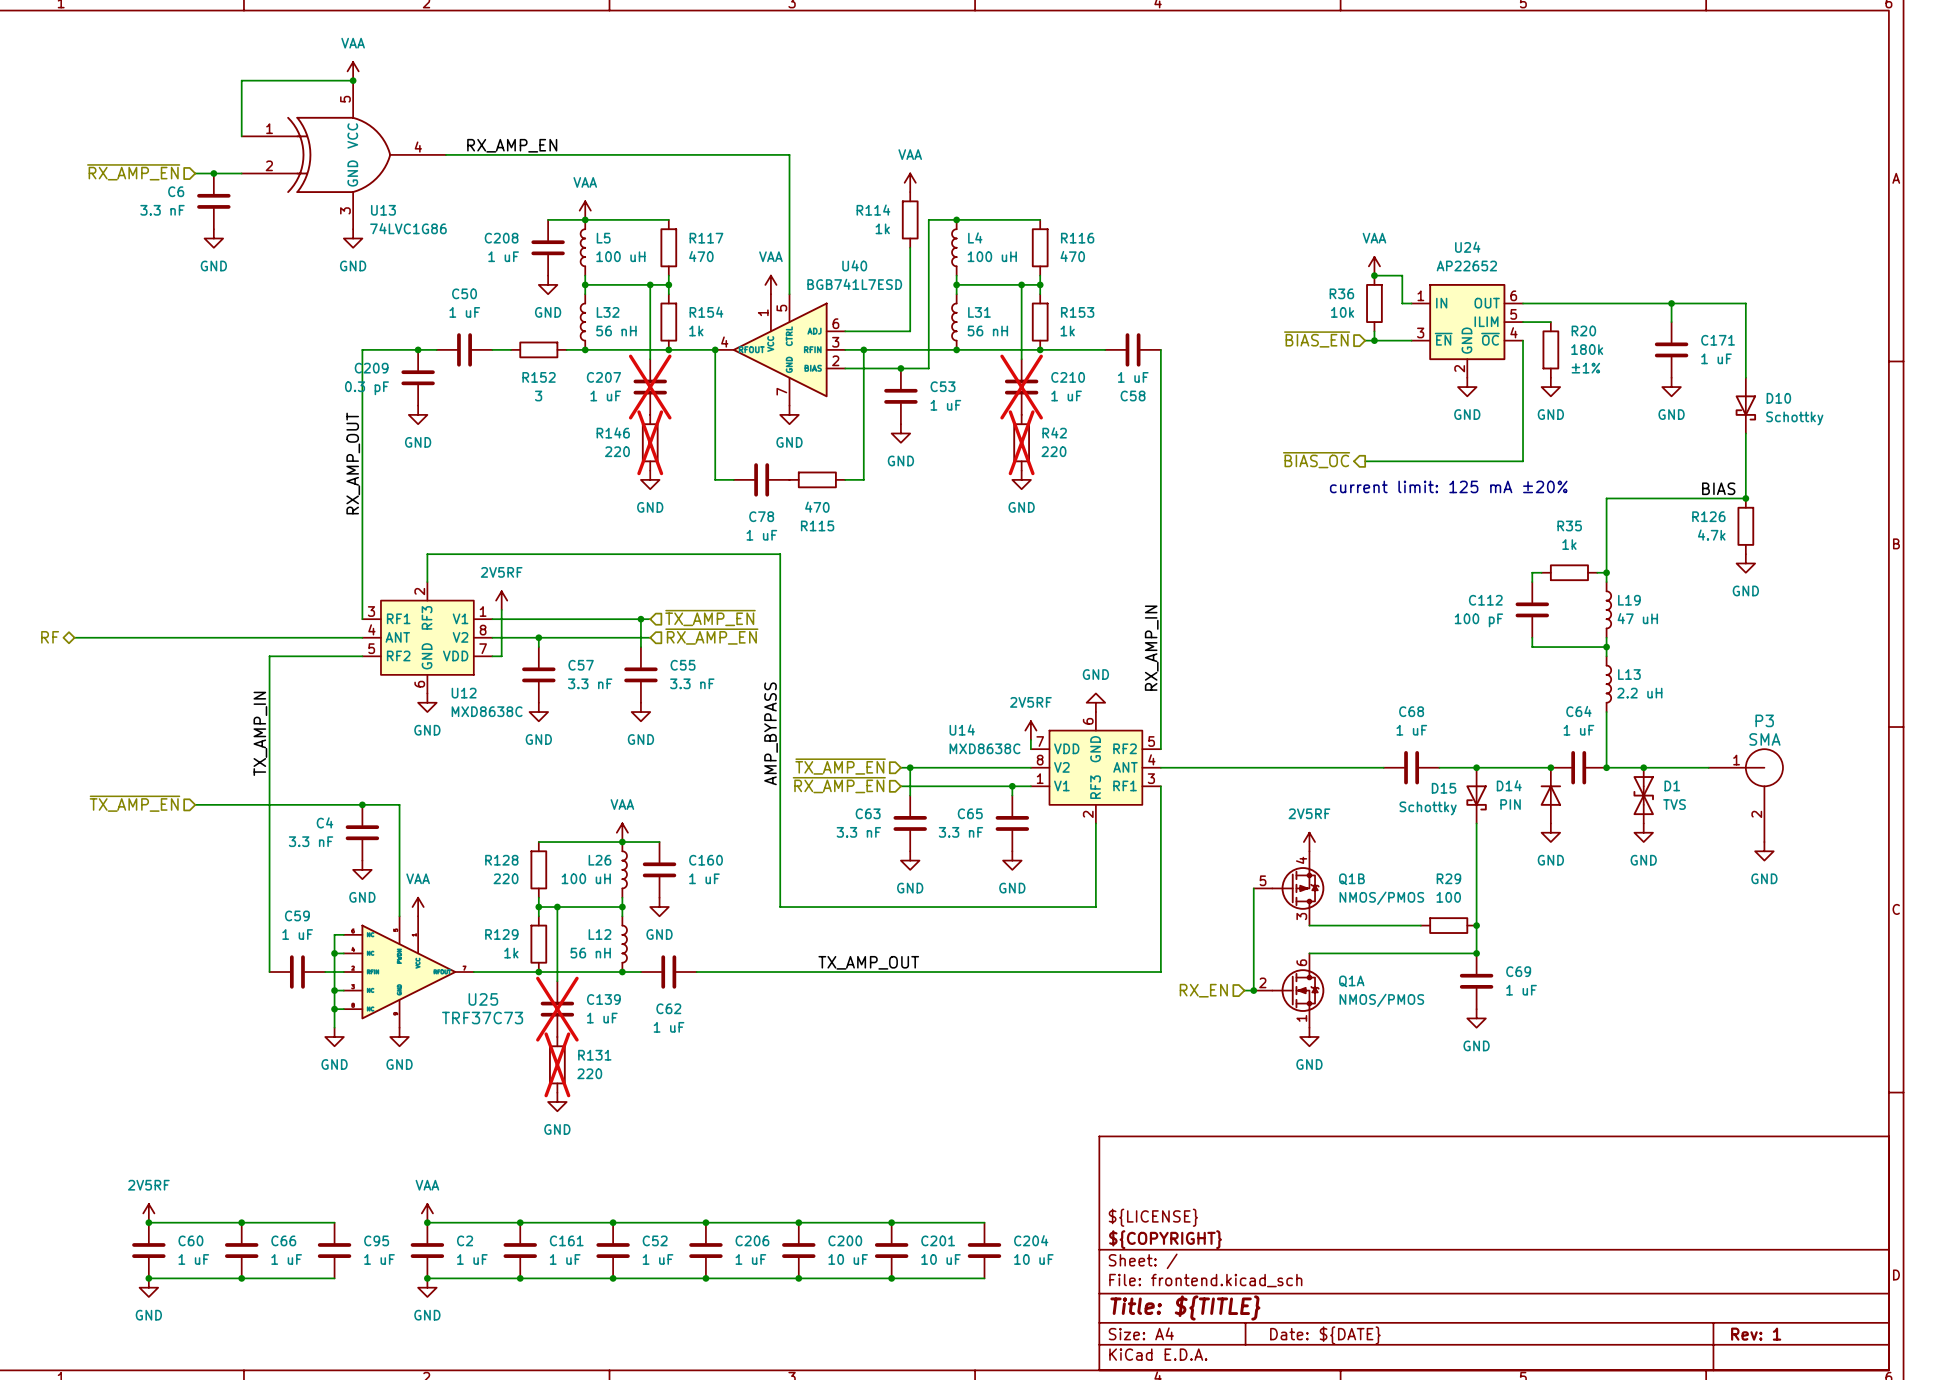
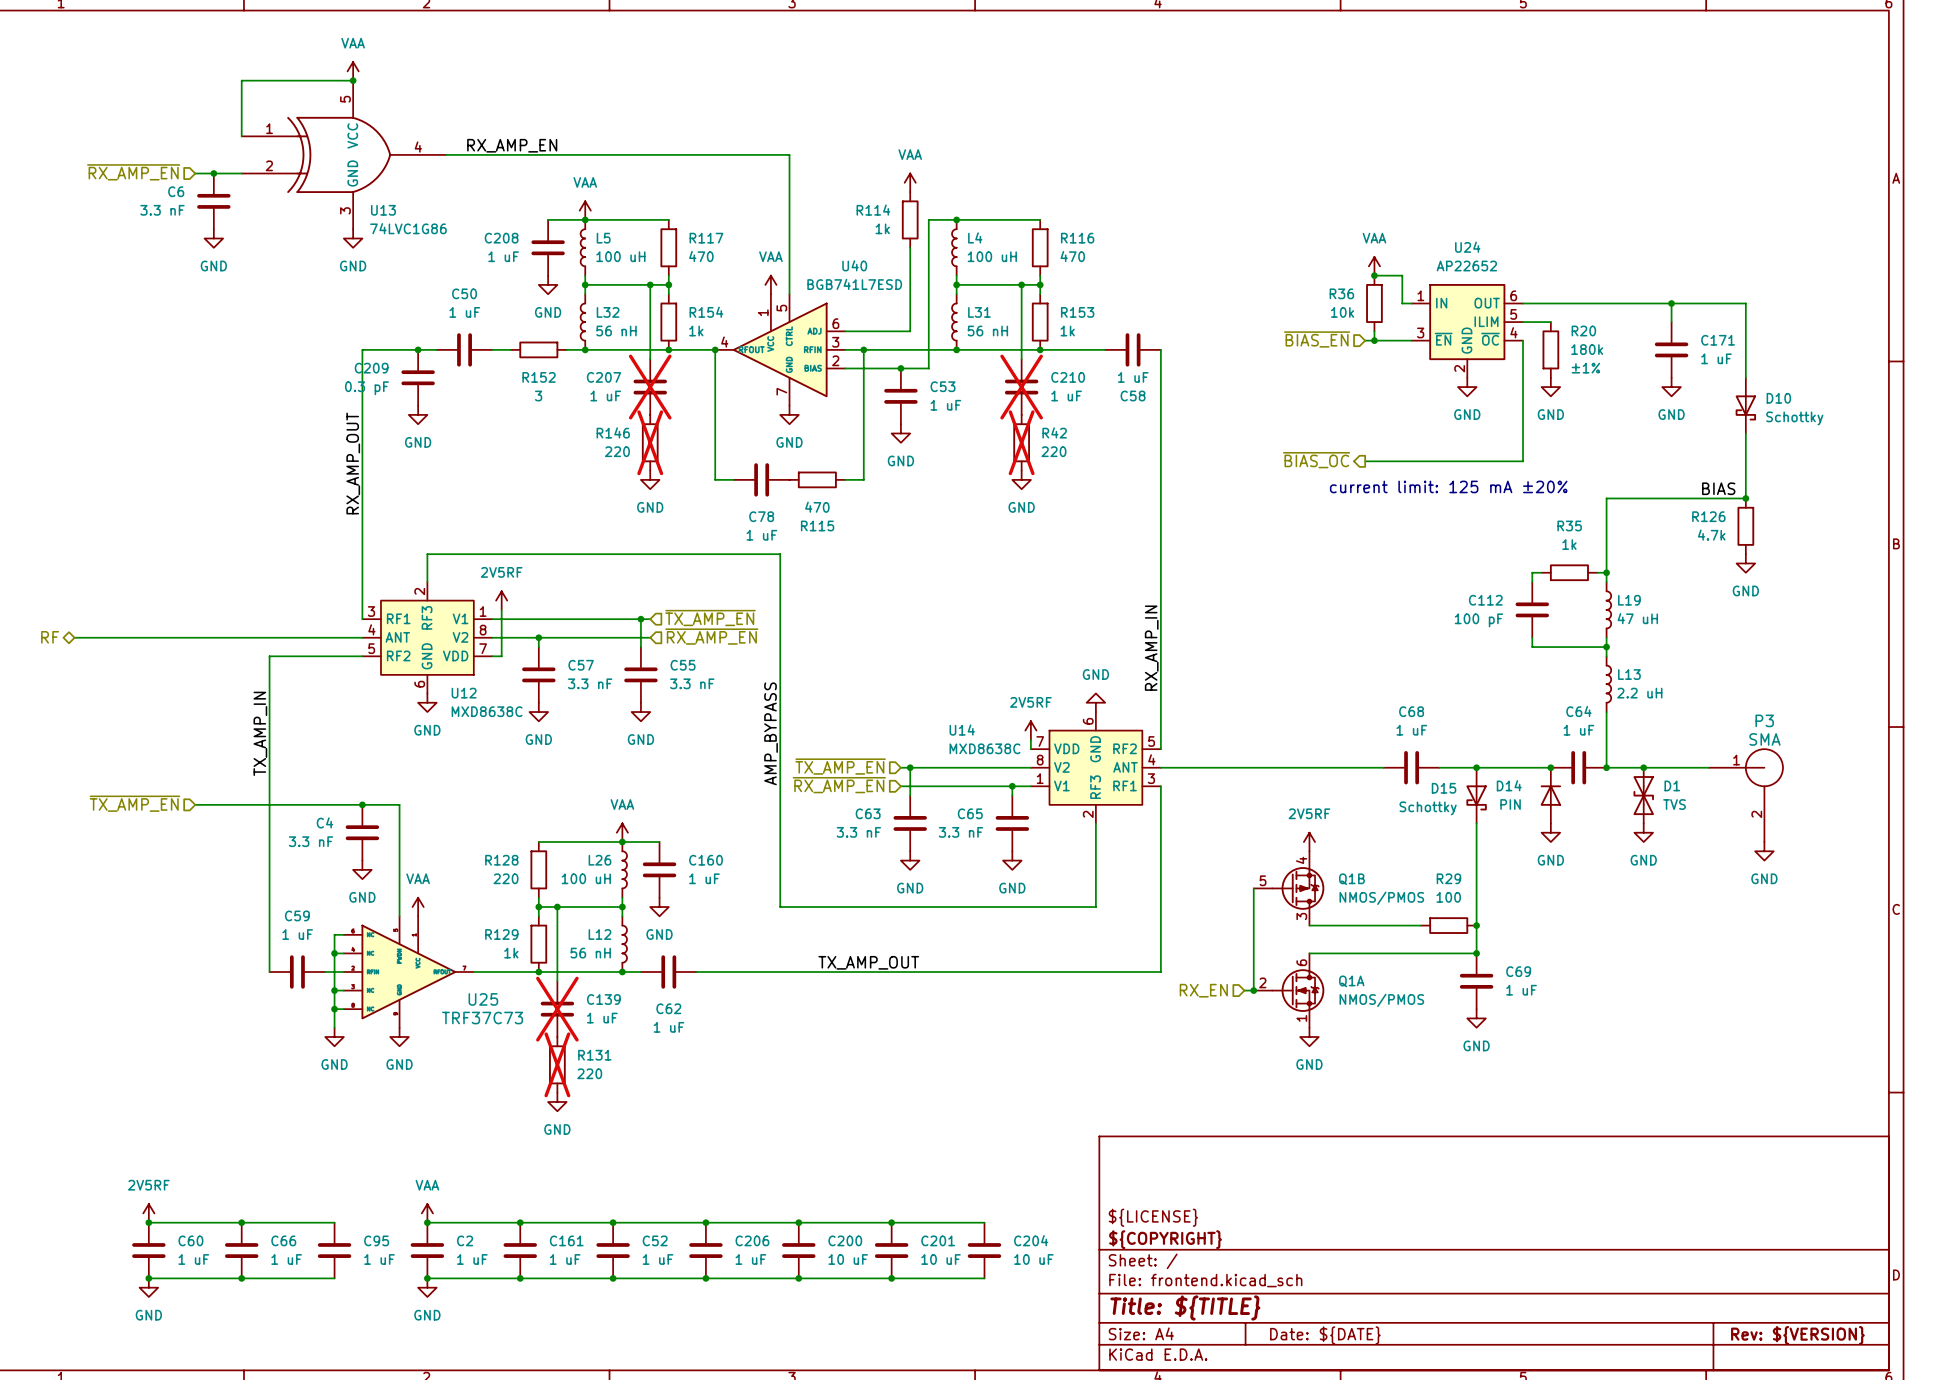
title block: Rev: 1 (1756, 1334) -> Rev: ${VERSION} (1797, 1335)

